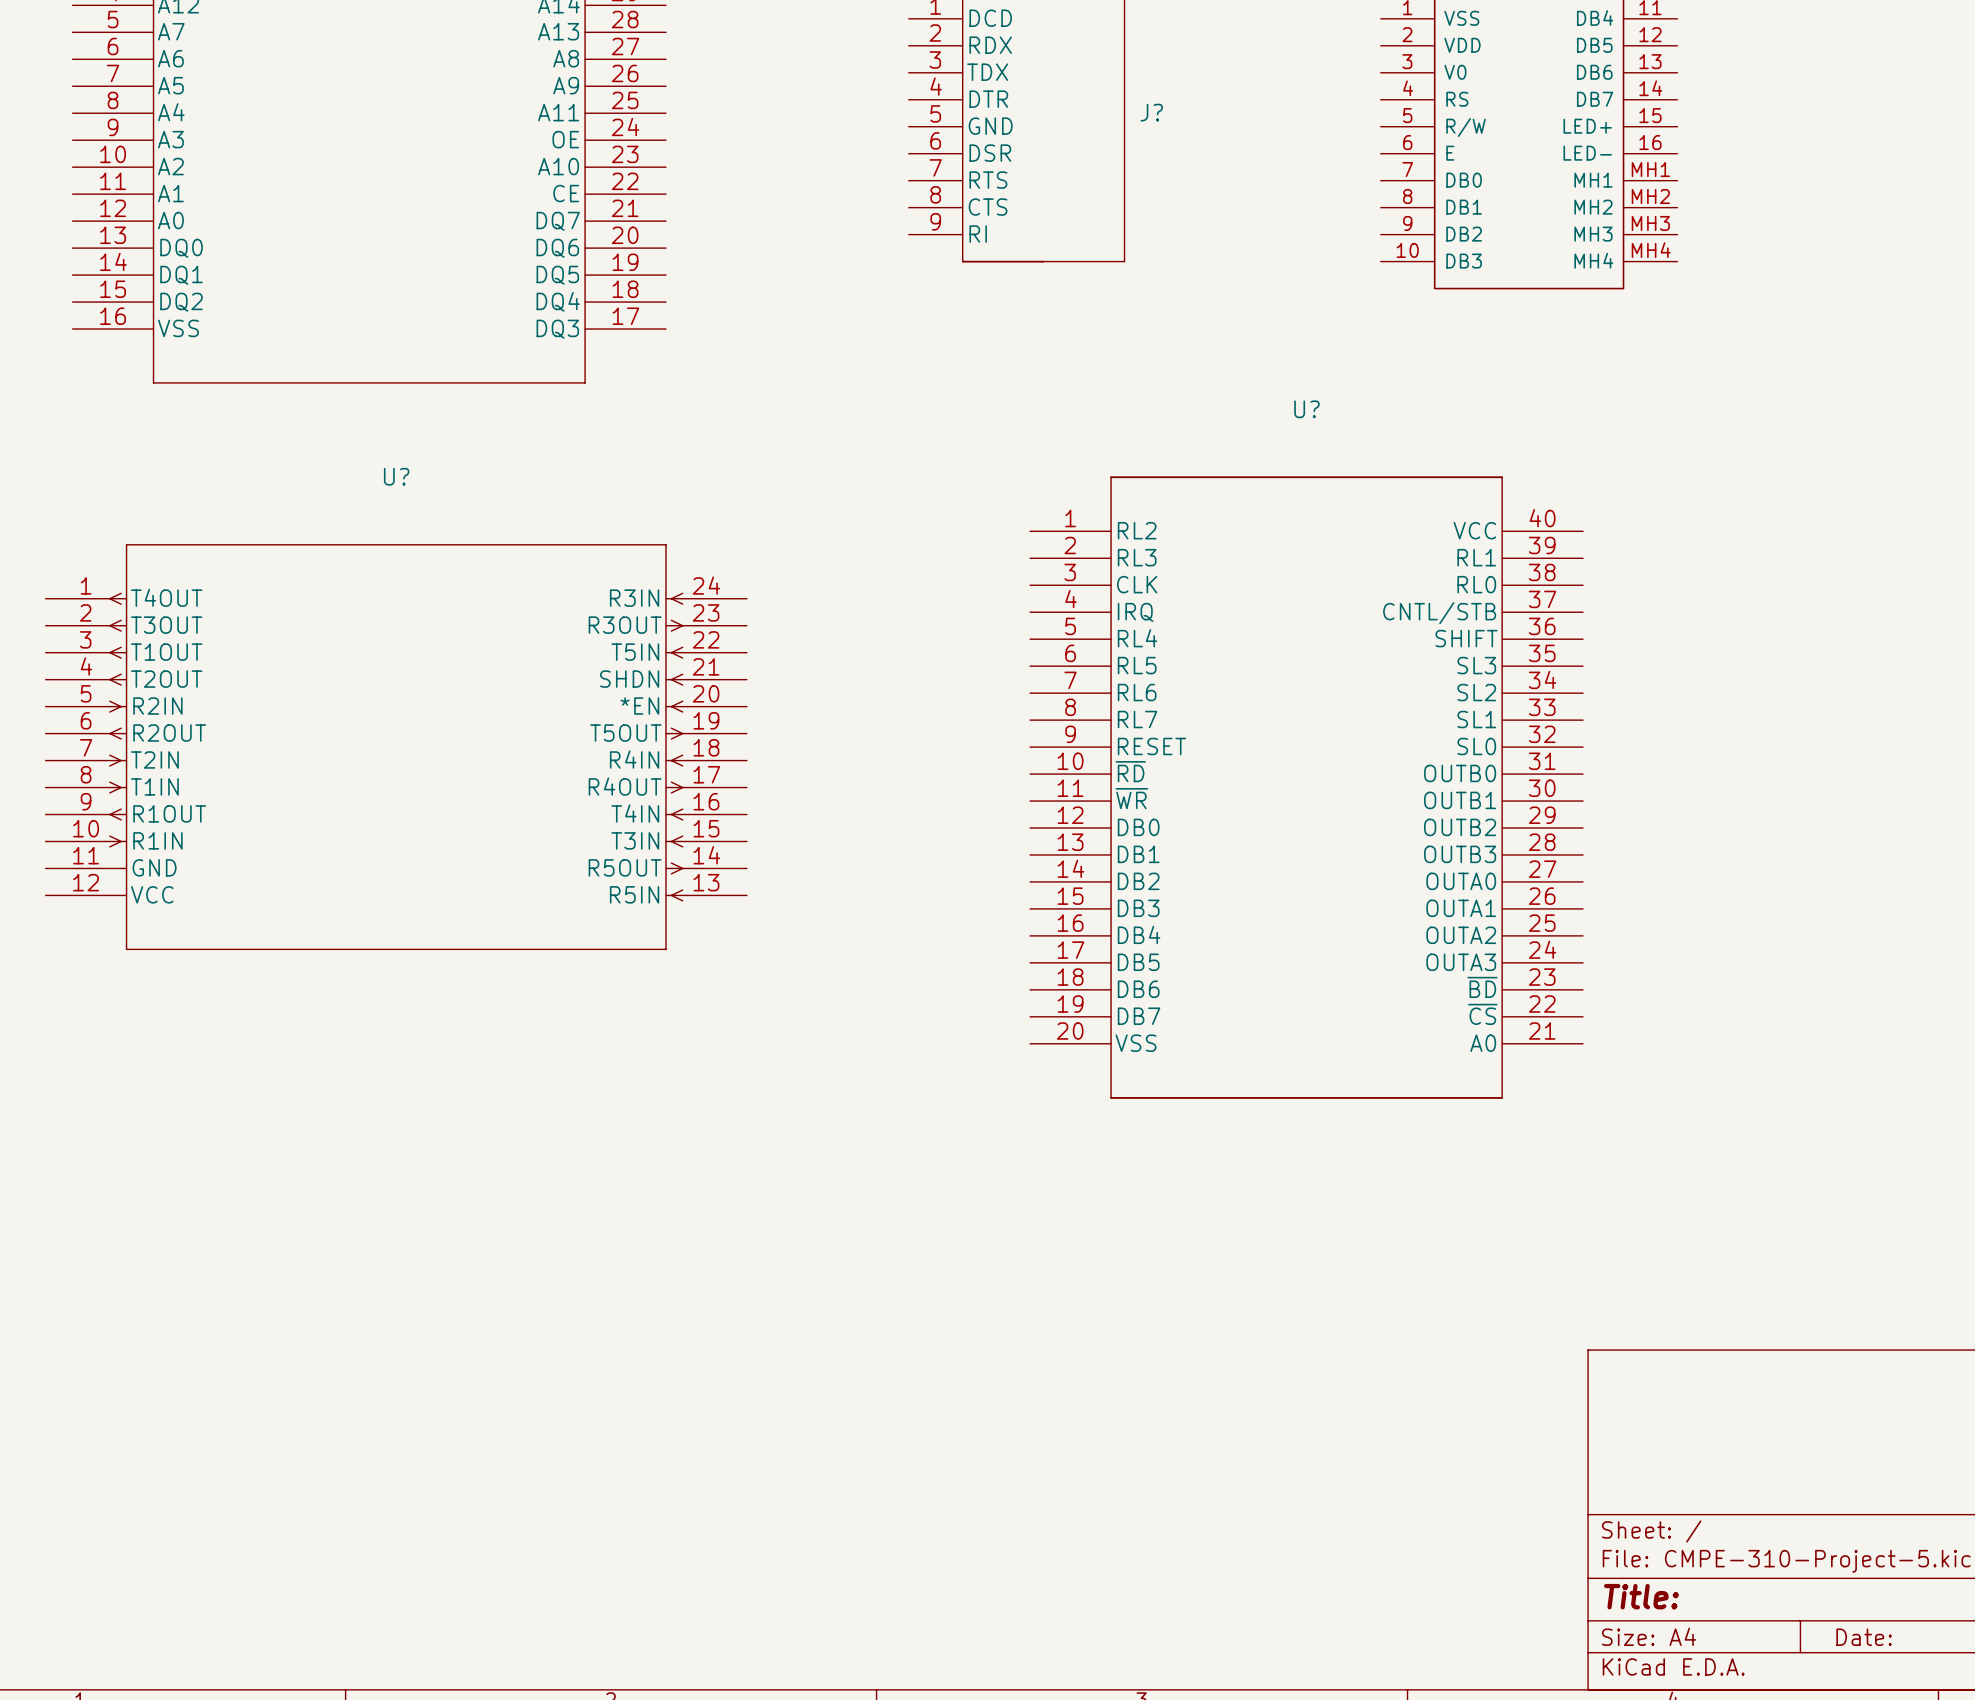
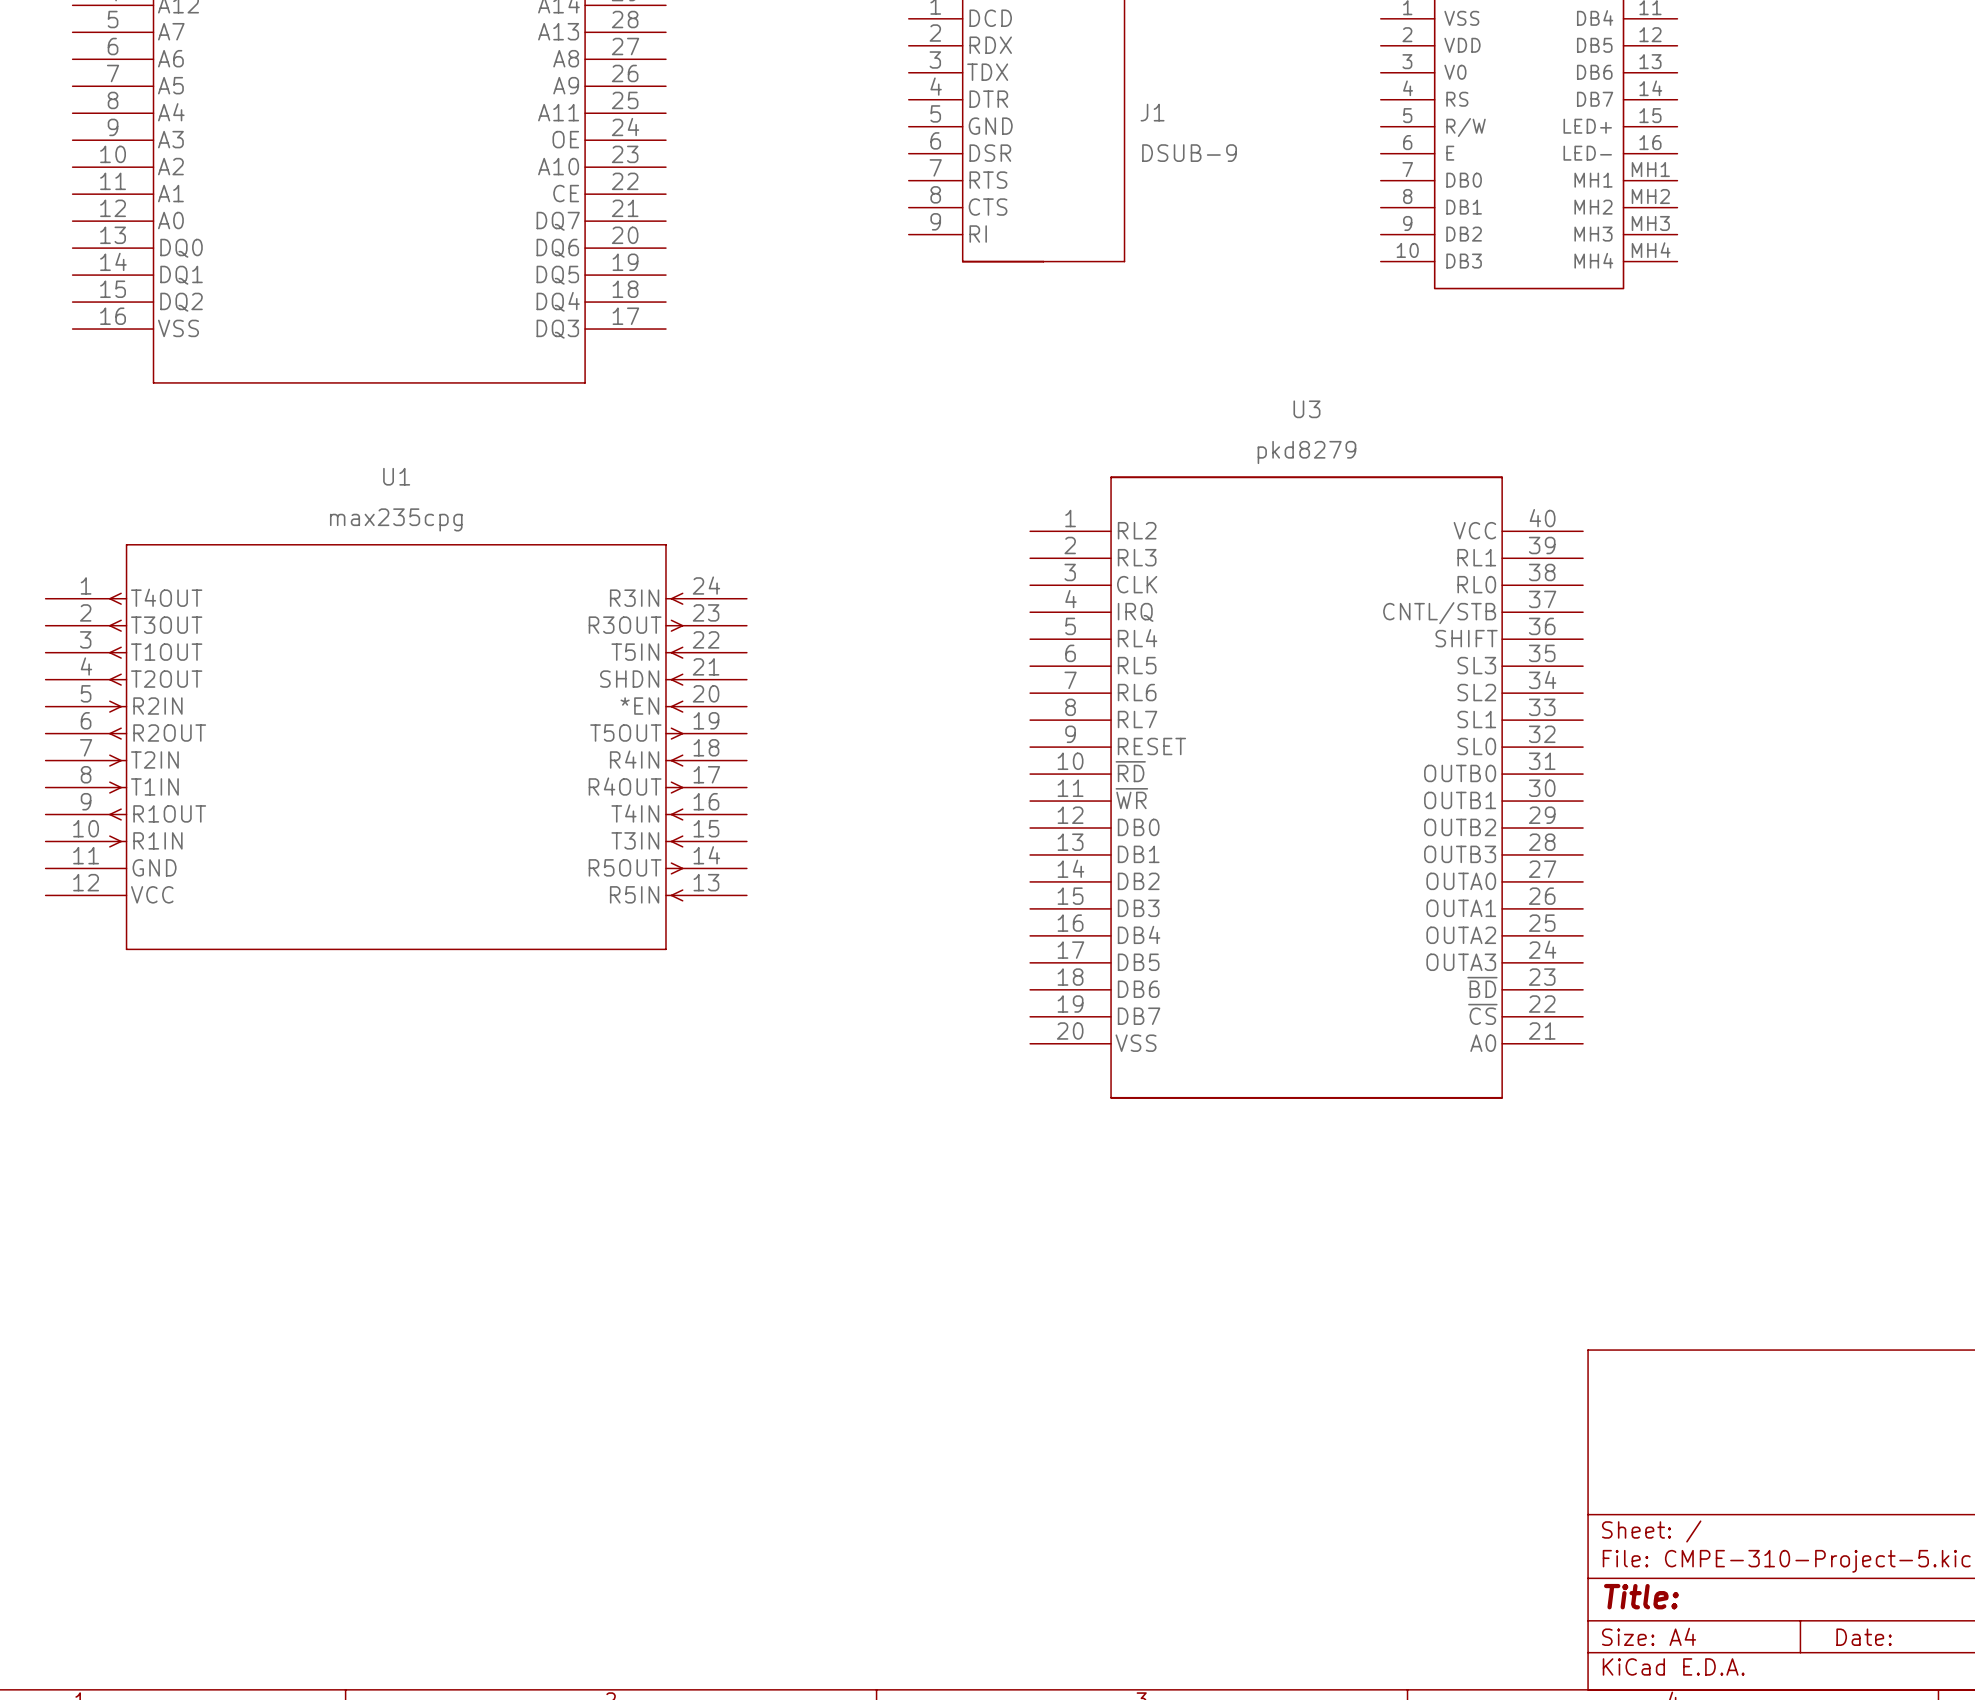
J? name: J? (1151, 112) -> J1 (1152, 112)
J? value: none -> DSUB-9 (1189, 153)
U? name: U? (1306, 409) -> U3 (1306, 409)
U? value: none -> pkd8279 (1306, 452)
U? name: U? (396, 476) -> U1 (396, 476)
U? value: none -> max235cpg (396, 519)

